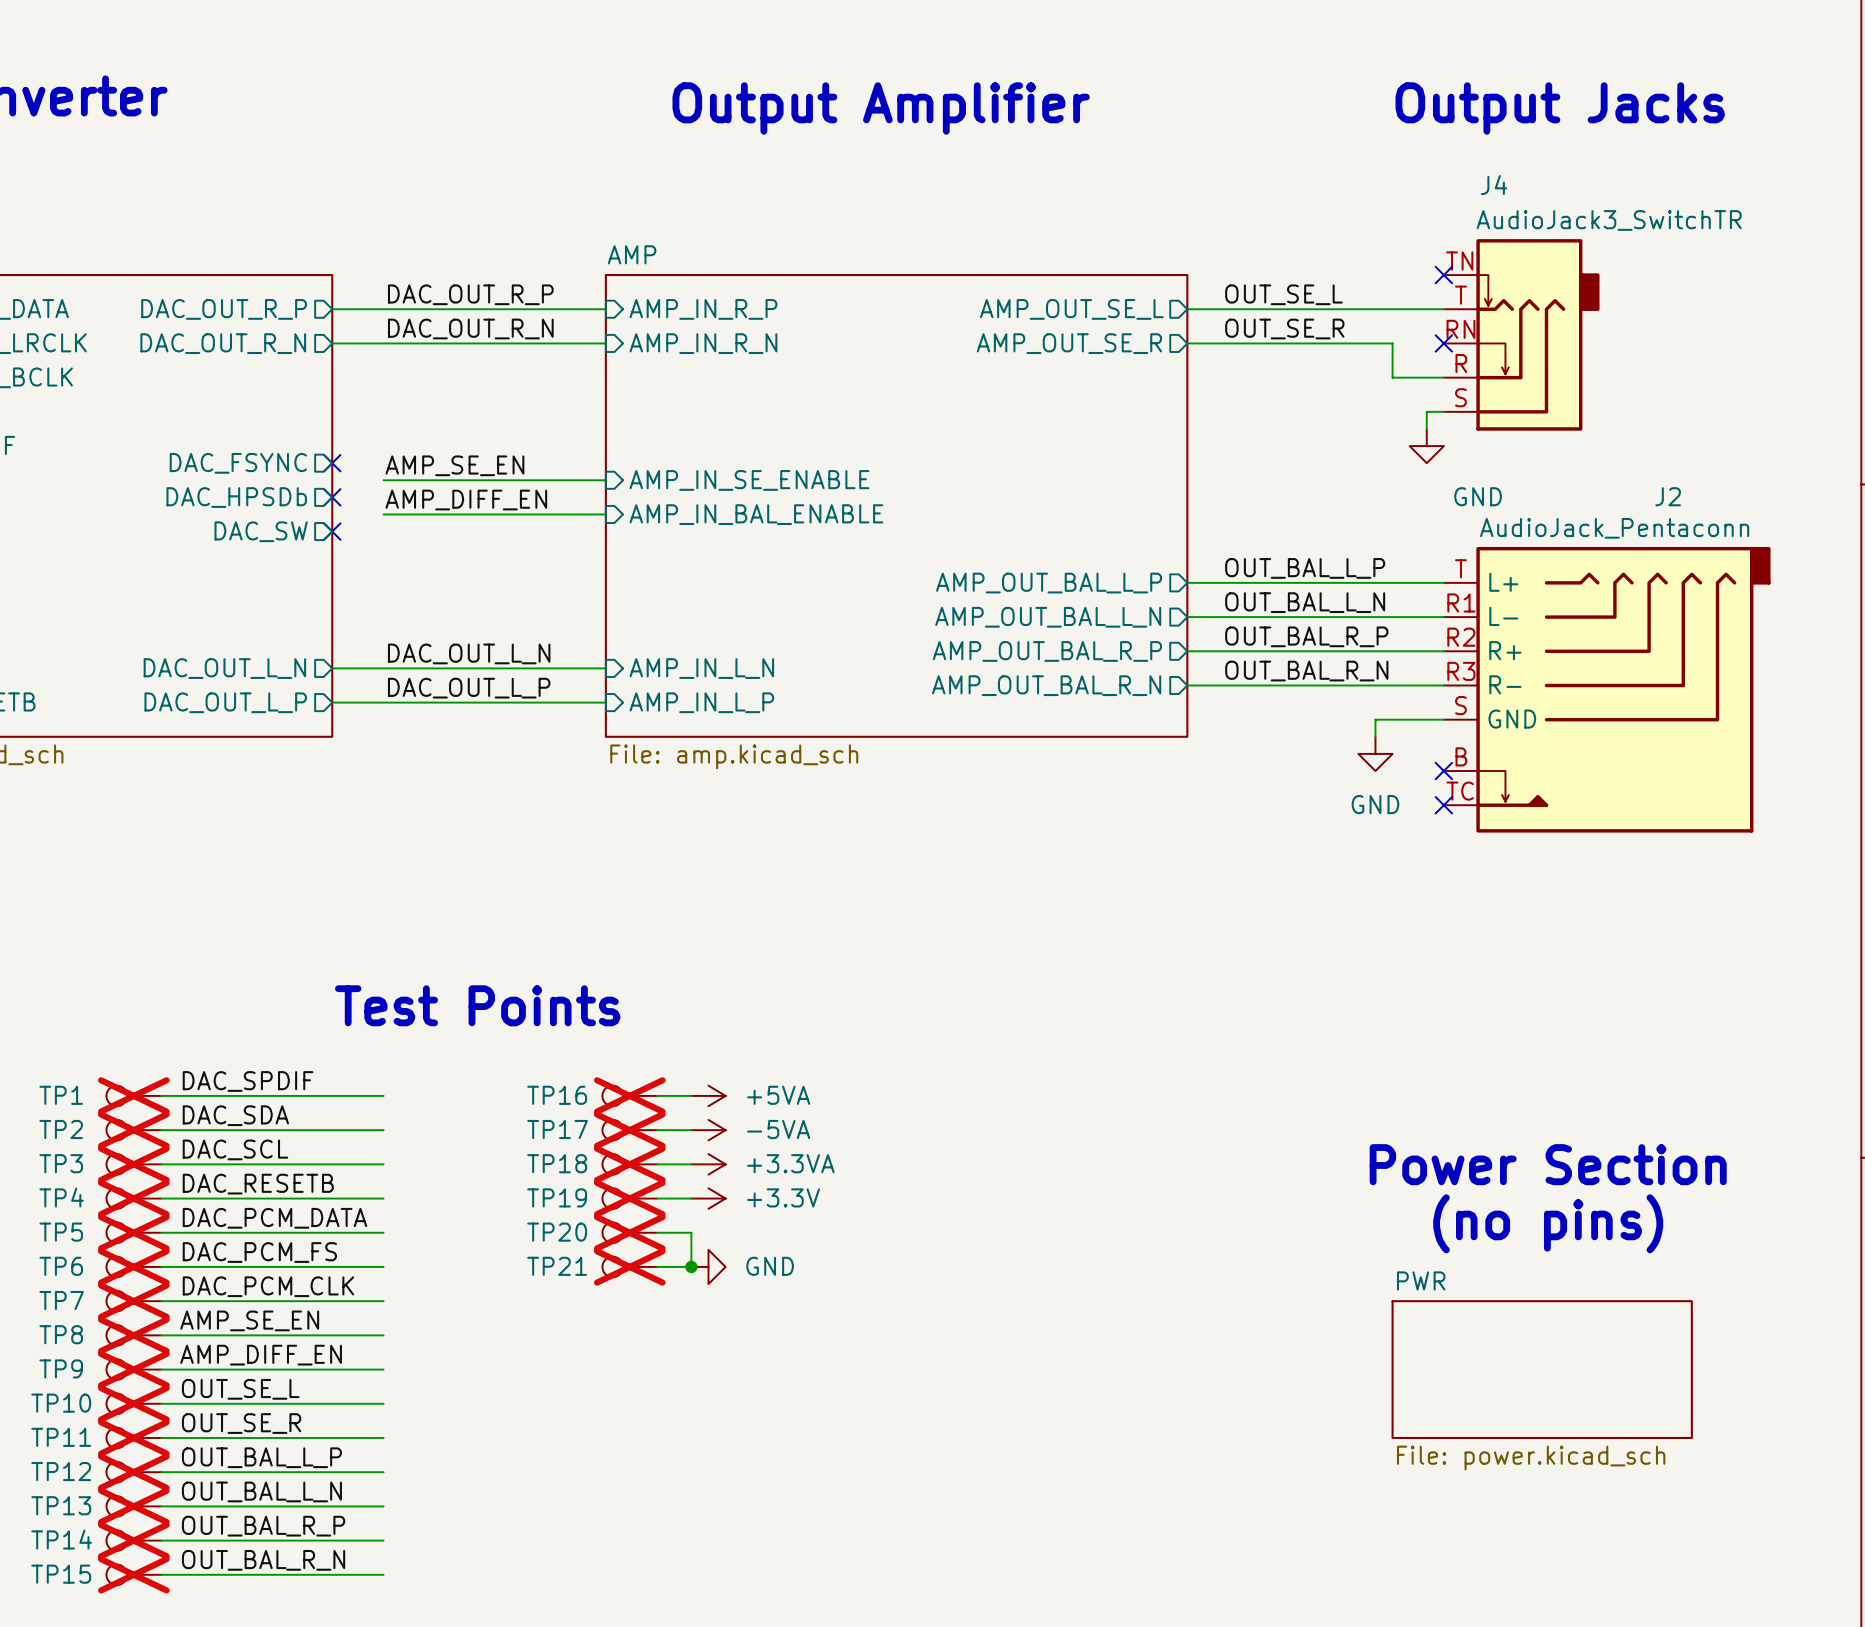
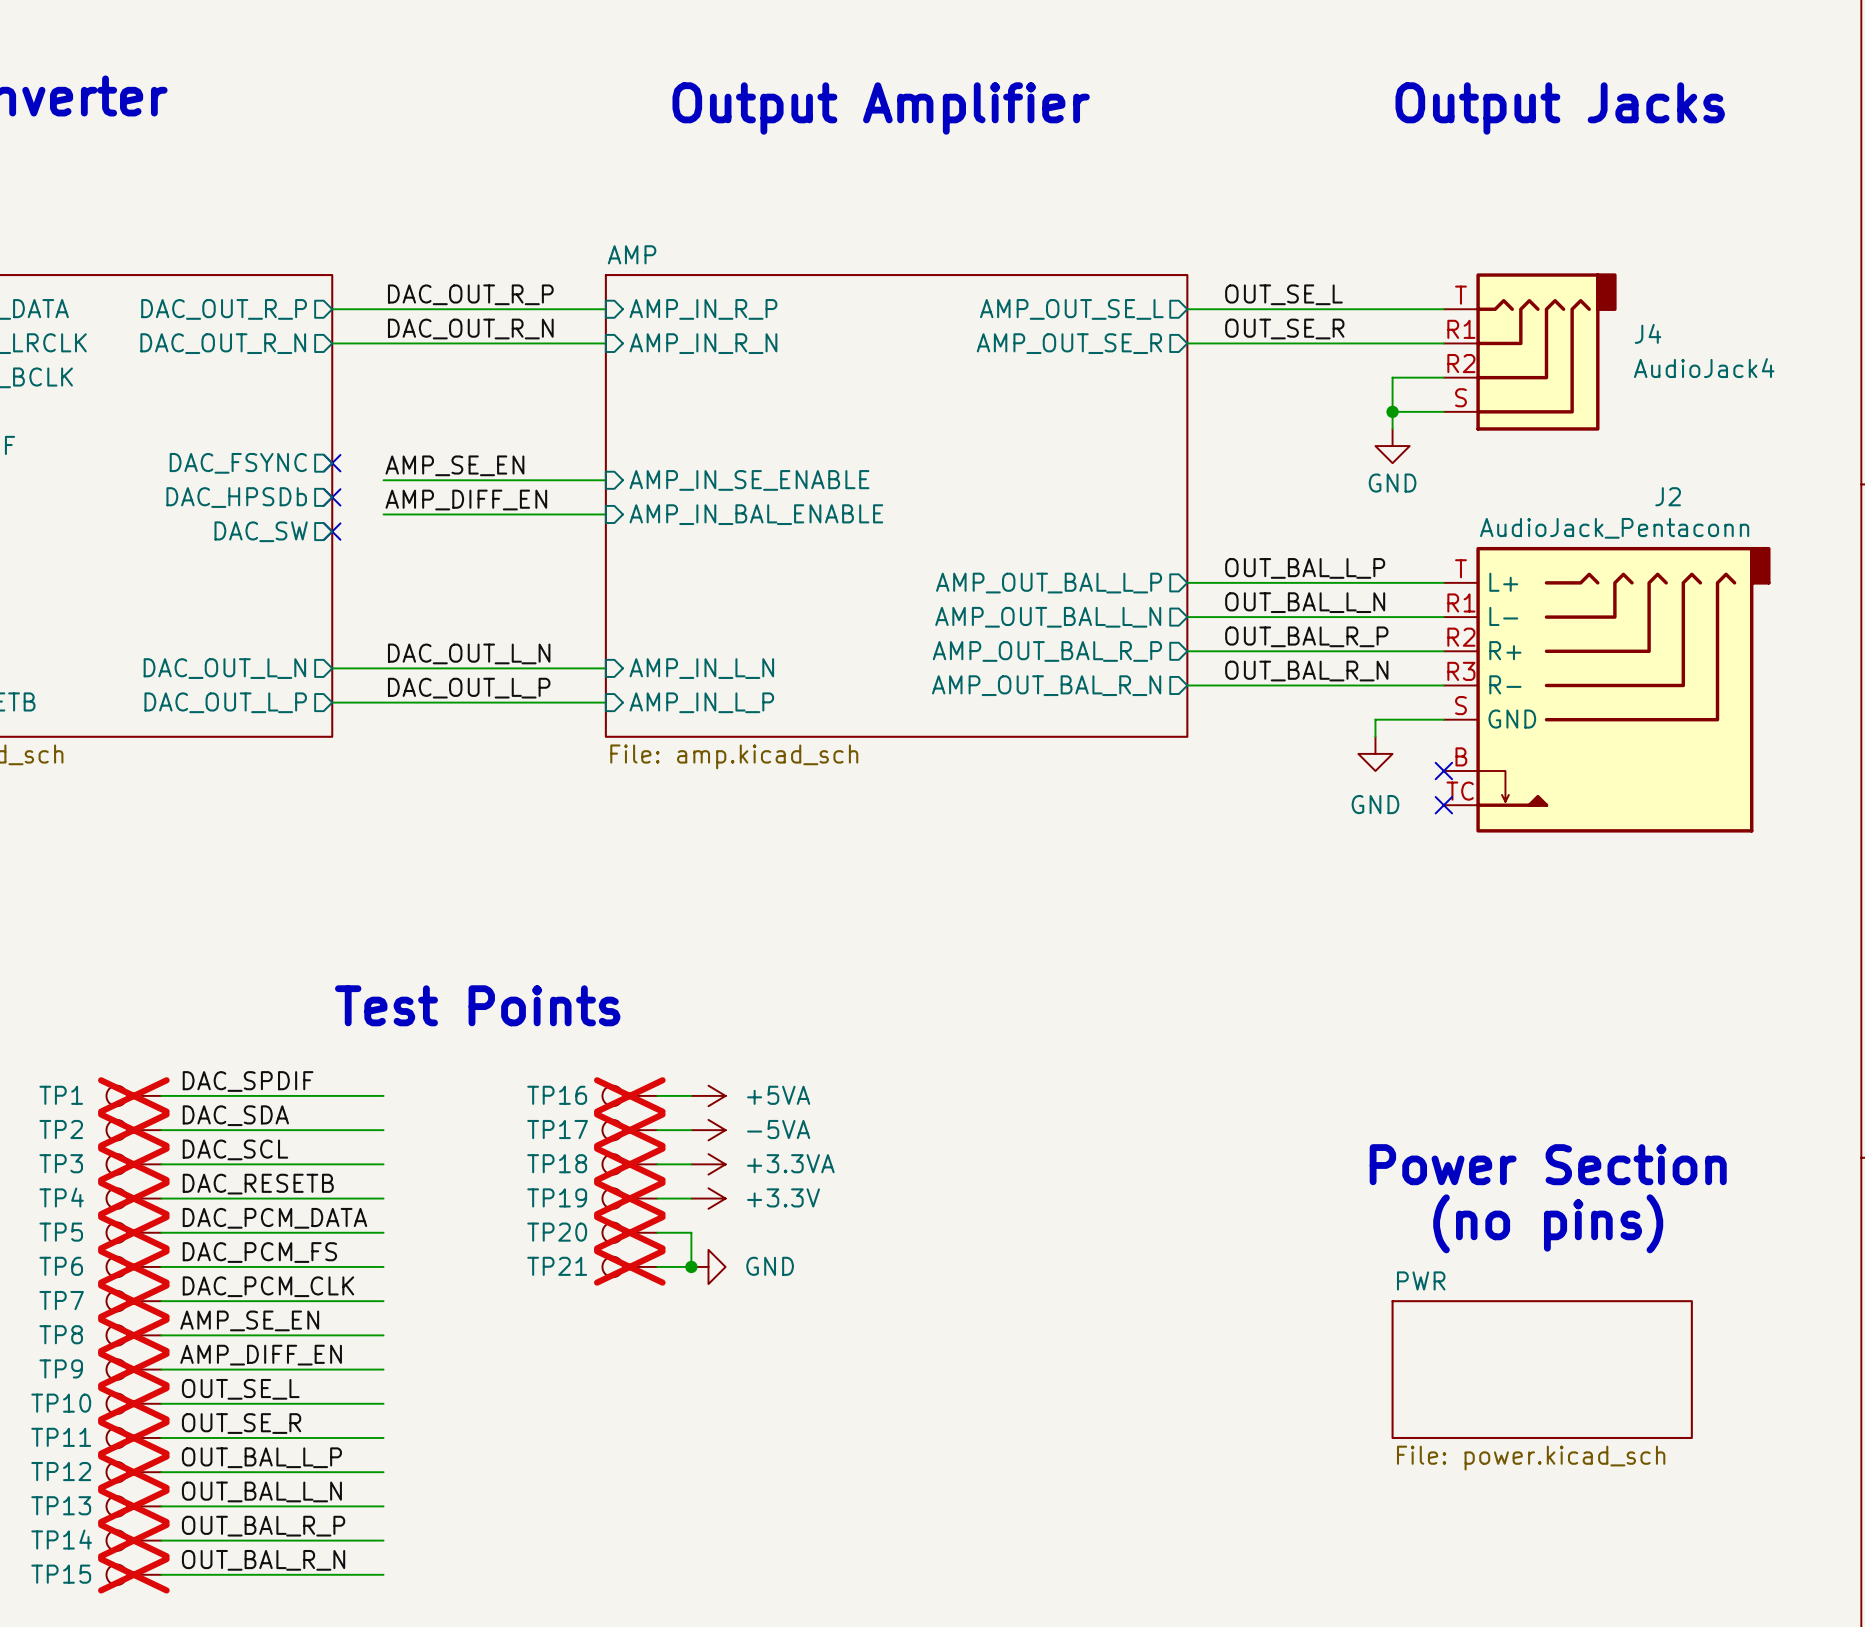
J4 name position: J4 (1494, 185) -> J4 (1648, 333)
J4 value: AudioJack3_SwitchTR (1609, 220) -> AudioJack4 (1704, 368)
J4 symbol: [1443, 239, 1600, 431] -> [1443, 273, 1617, 431]
no-connect mark: (1443, 275) -> none
wire: (1392, 343) (1392, 377) -> (1392, 343) (1443, 343)
no-connect mark: (1443, 343) -> none
wire: none -> (1392, 377) (1392, 428)
junction: none -> (1392, 411)
wire: (1426, 411) (1426, 428) -> (1426, 411) (1392, 411)
power symbol position: GND (1426, 446) -> GND (1392, 446)
power symbol text position: GND (1478, 496) -> GND (1392, 483)

